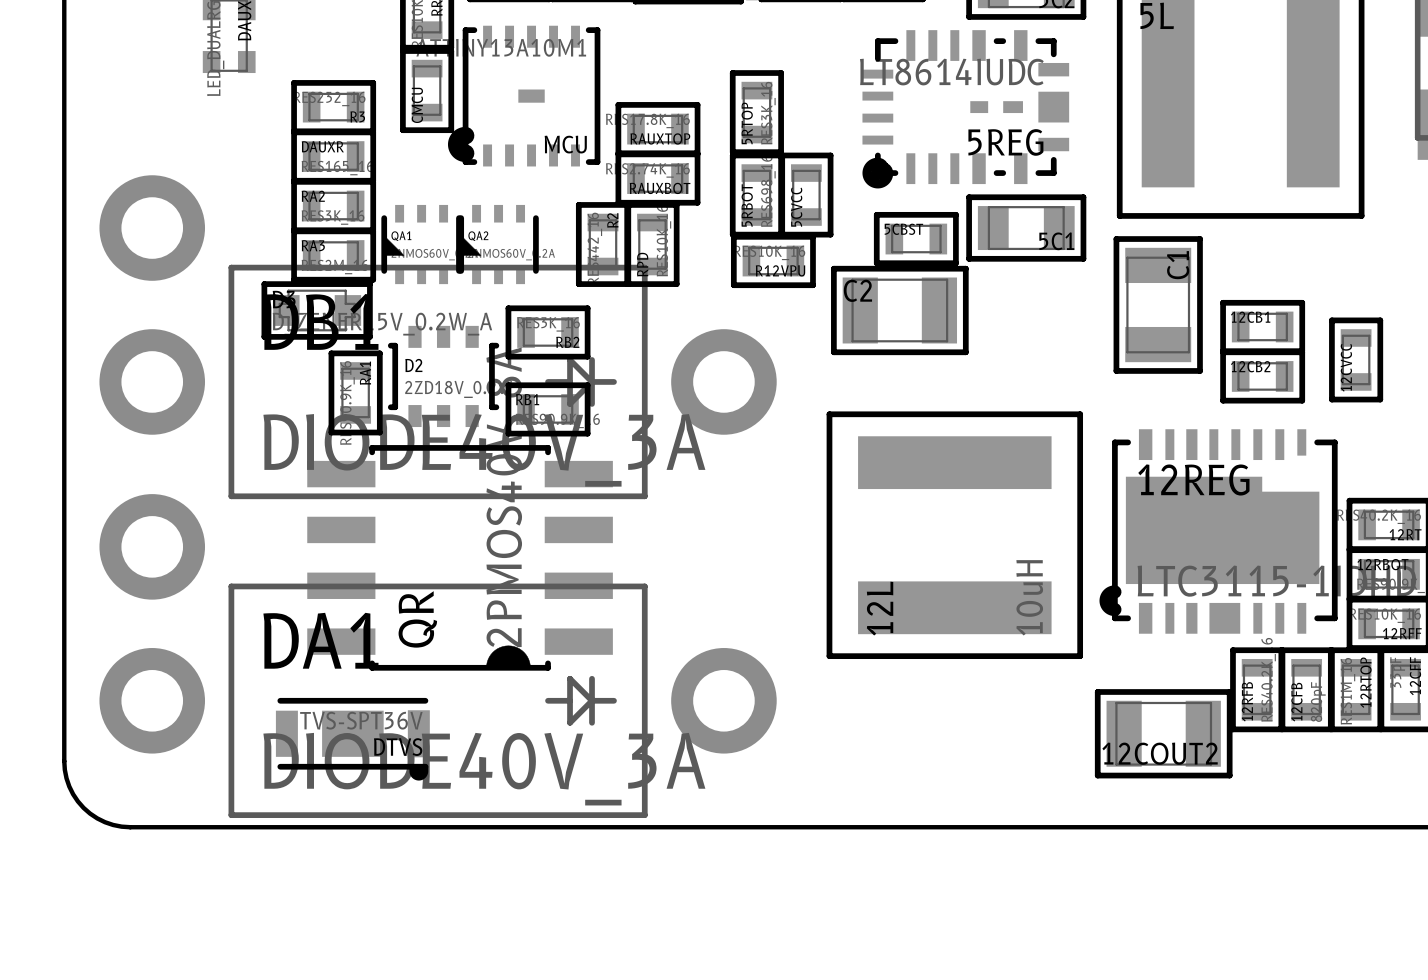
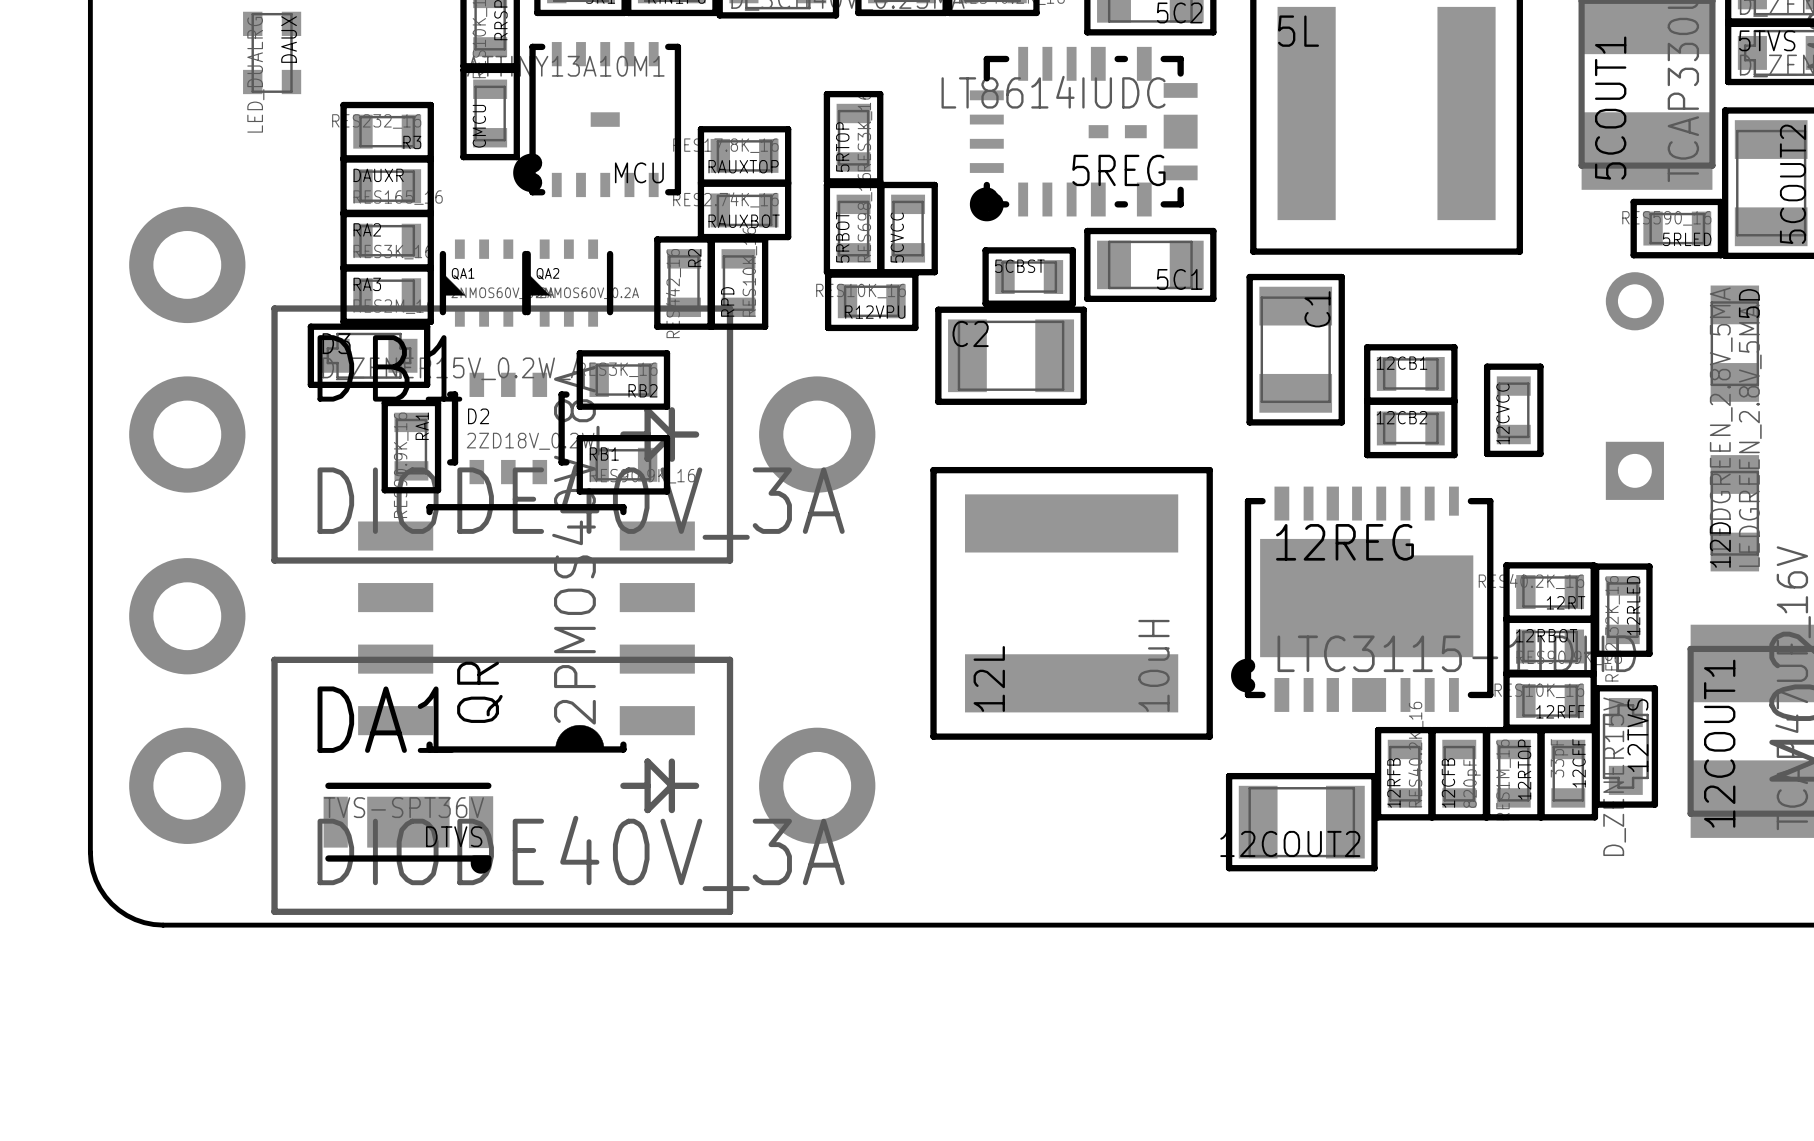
DTVS footprint: [275, 697, 430, 781] -> [323, 782, 494, 874]

